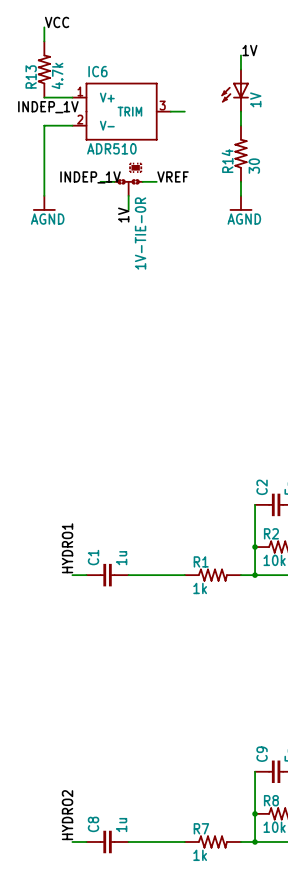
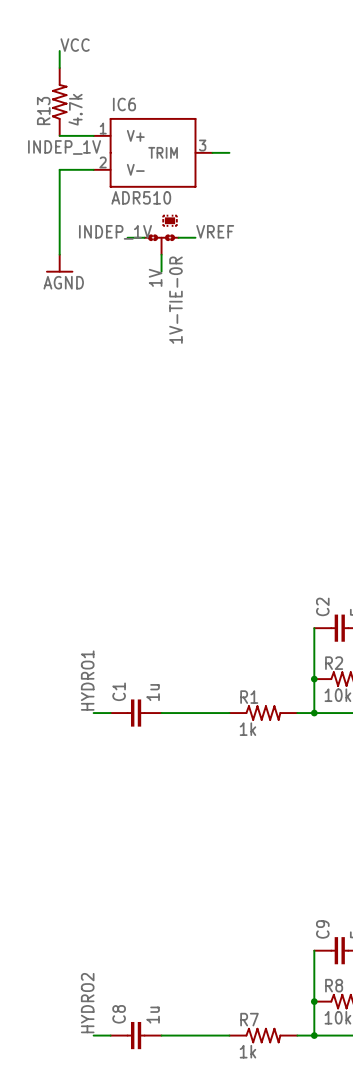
label: 1V (249, 50) -> none
wire: (240, 55) (240, 69) -> none
1V: (235, 90) -> none
wire: (240, 111) (240, 125) -> none
R14: 30 (240, 153) -> none
wire: (240, 181) (240, 195) -> none
power symbol: AGND (240, 203) -> none

